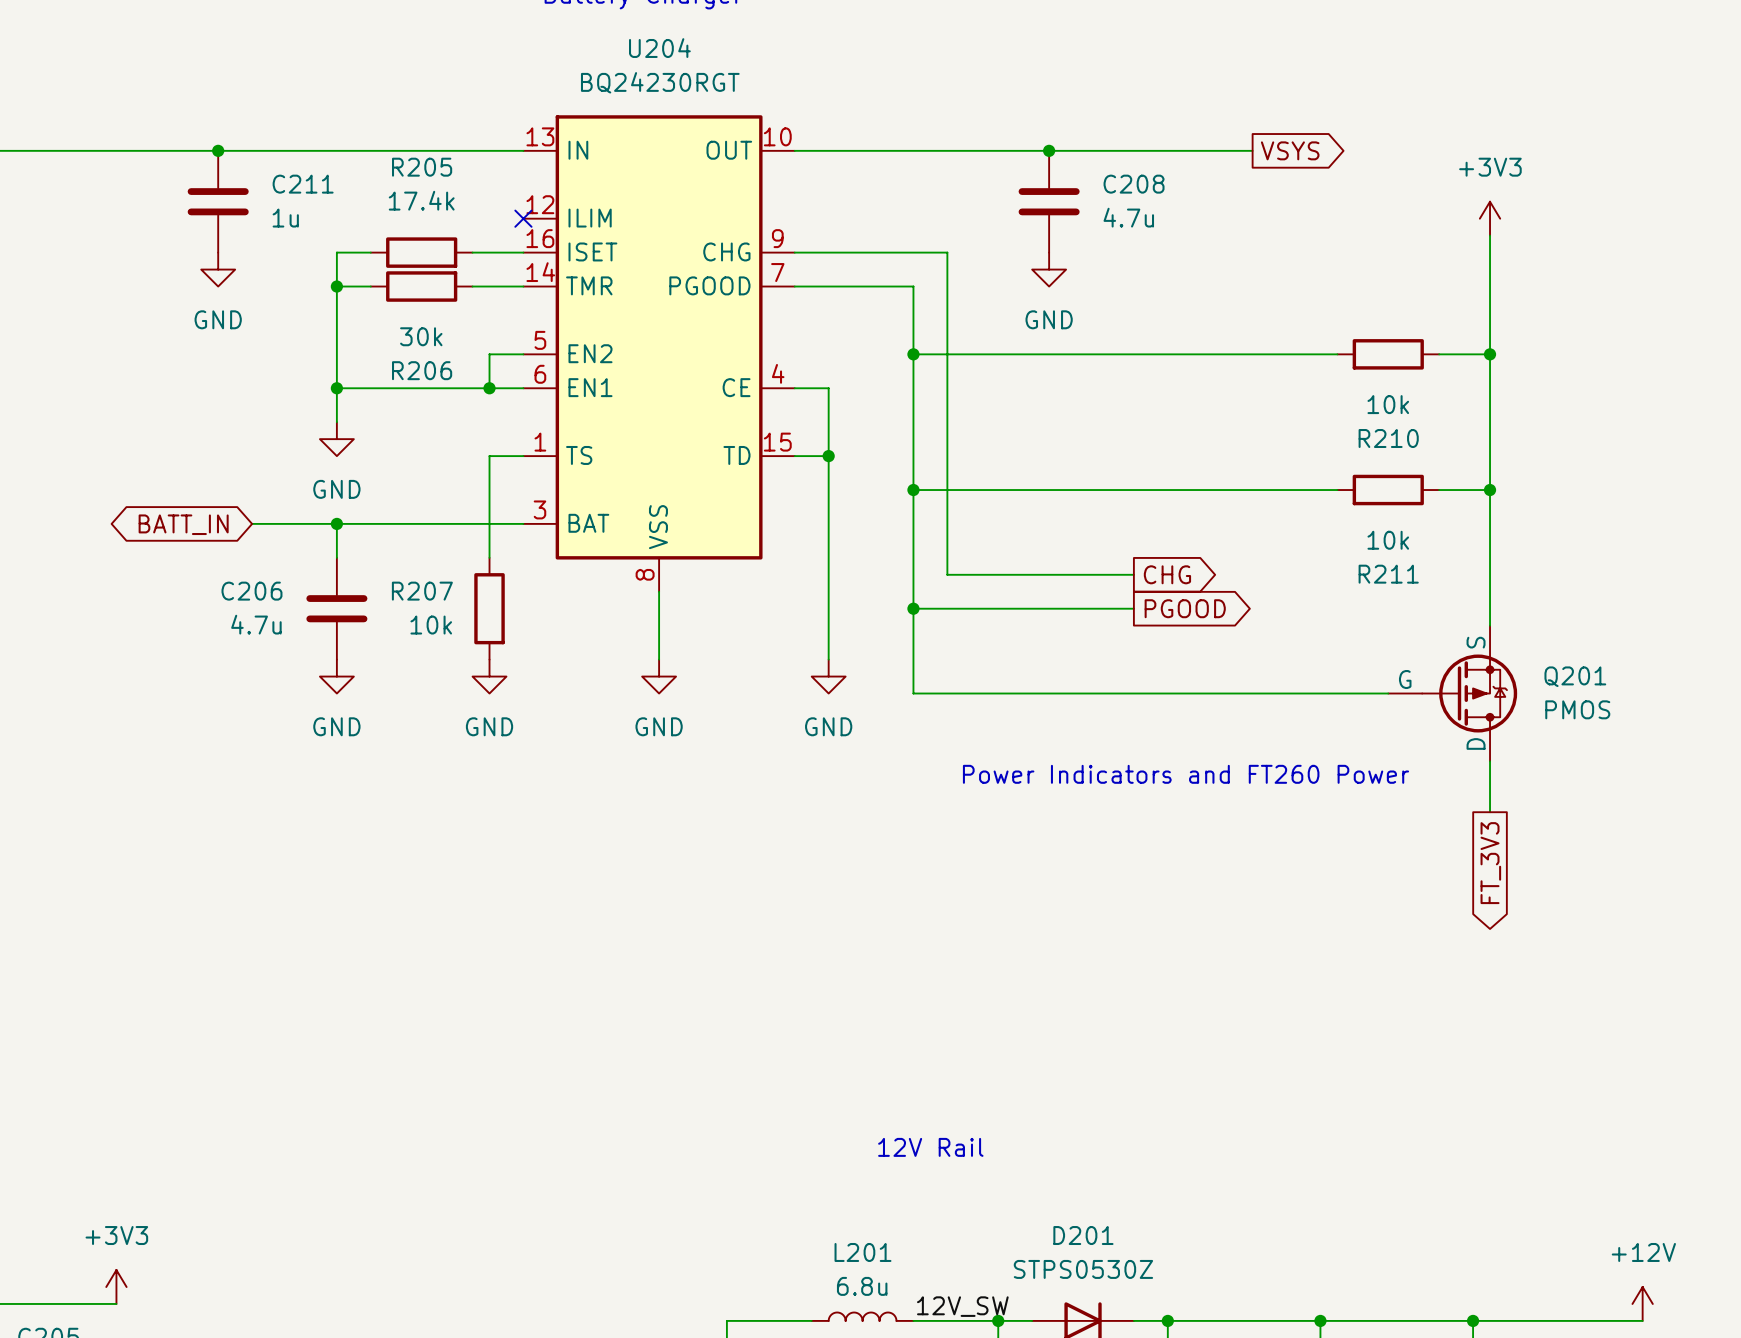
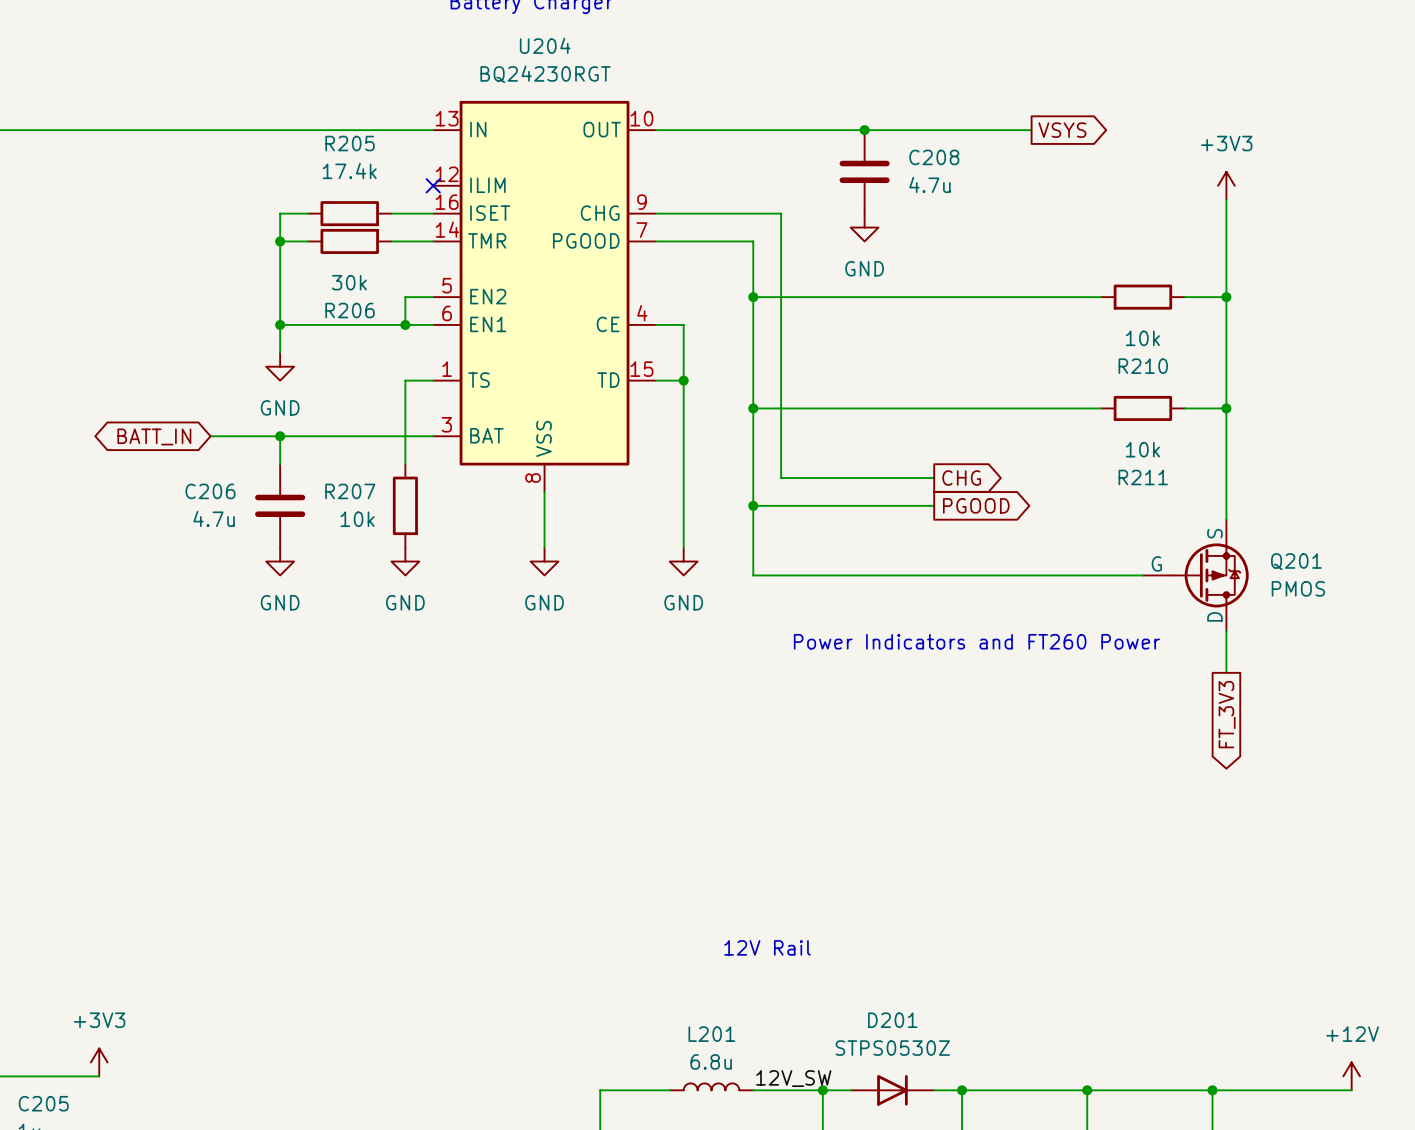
junction: (218, 150) -> none
C211: 1u (218, 201) -> none
power symbol: GND (218, 269) -> none

